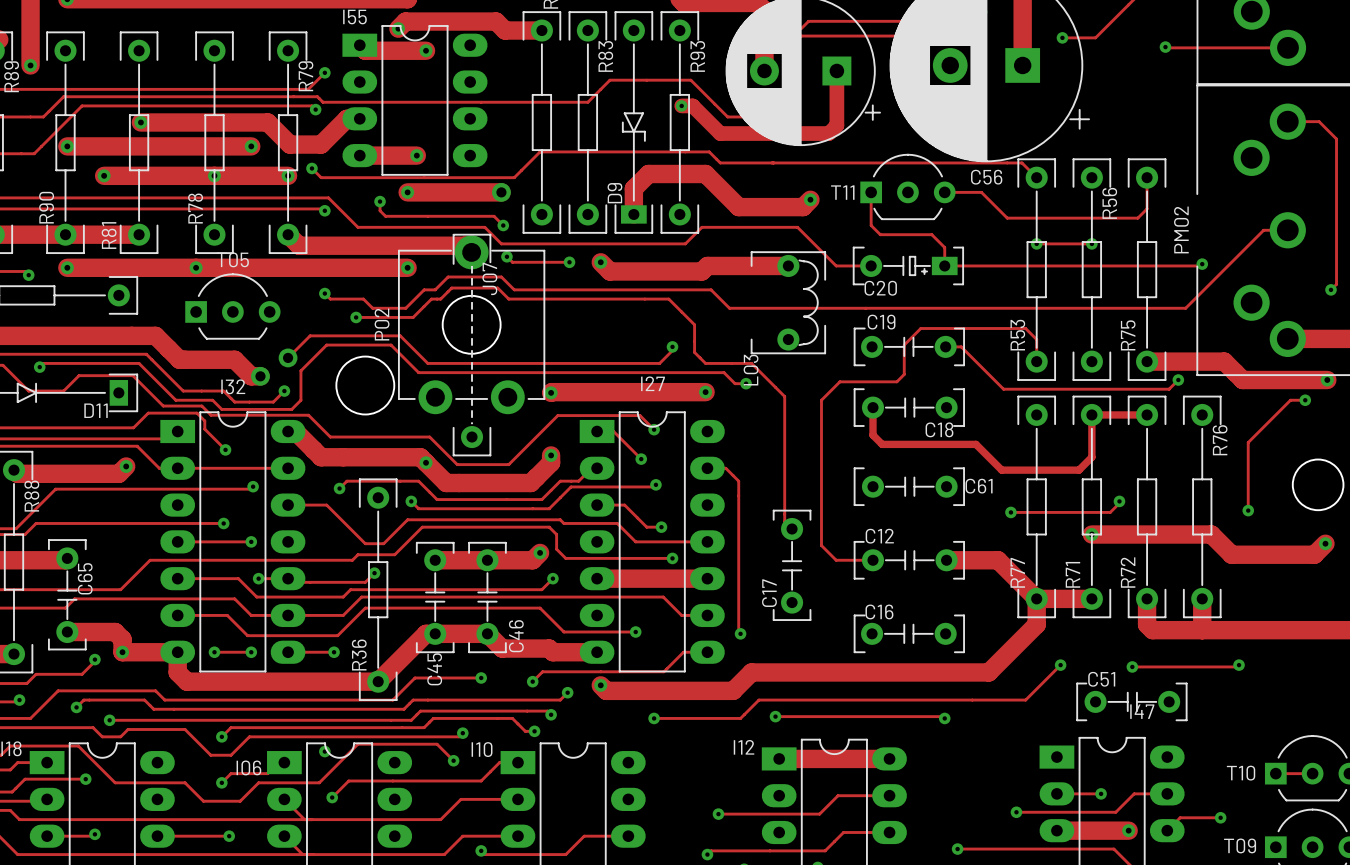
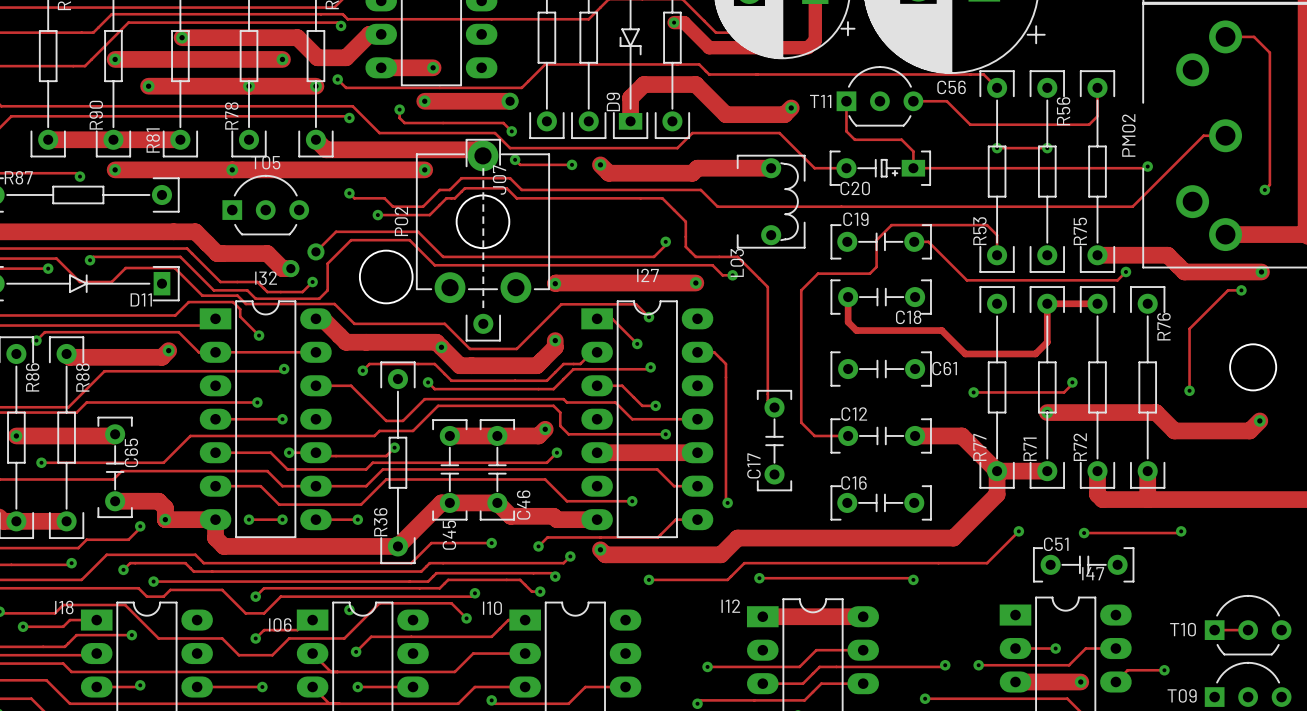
track: none -> (945, 665) (943, 666) (819, 666) (802, 683) (762, 683)
via: none -> (945, 665)
track: none -> (357, 687) (413, 687)
via: none -> (357, 687)

